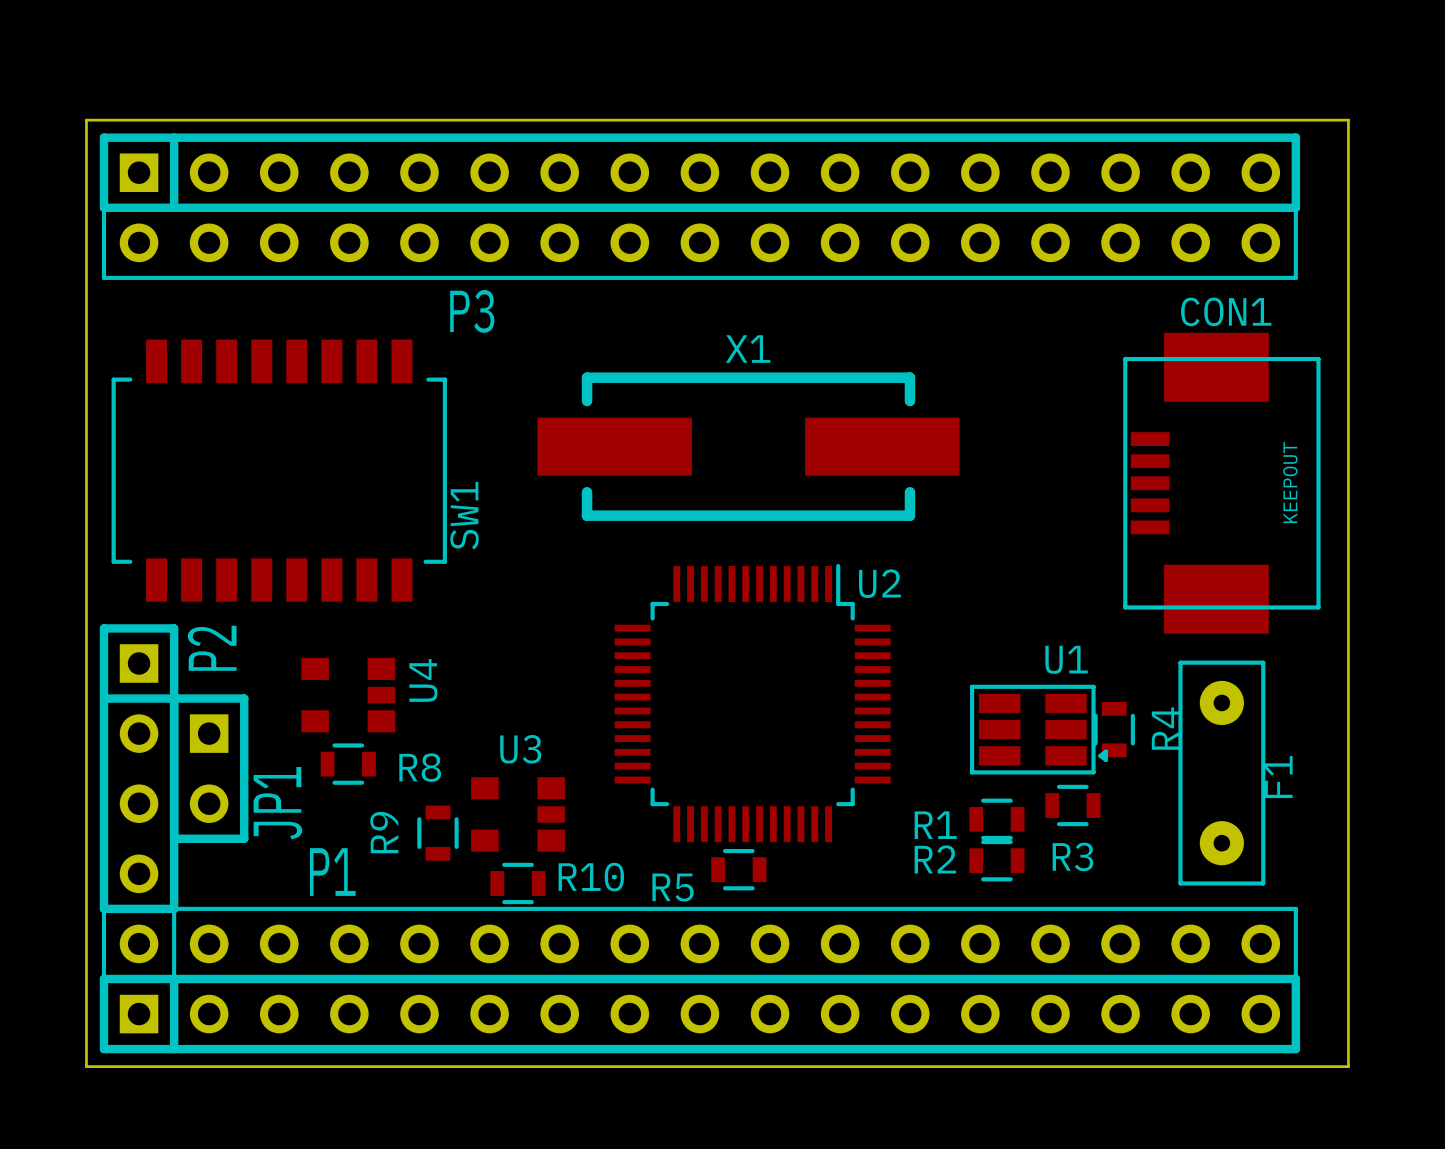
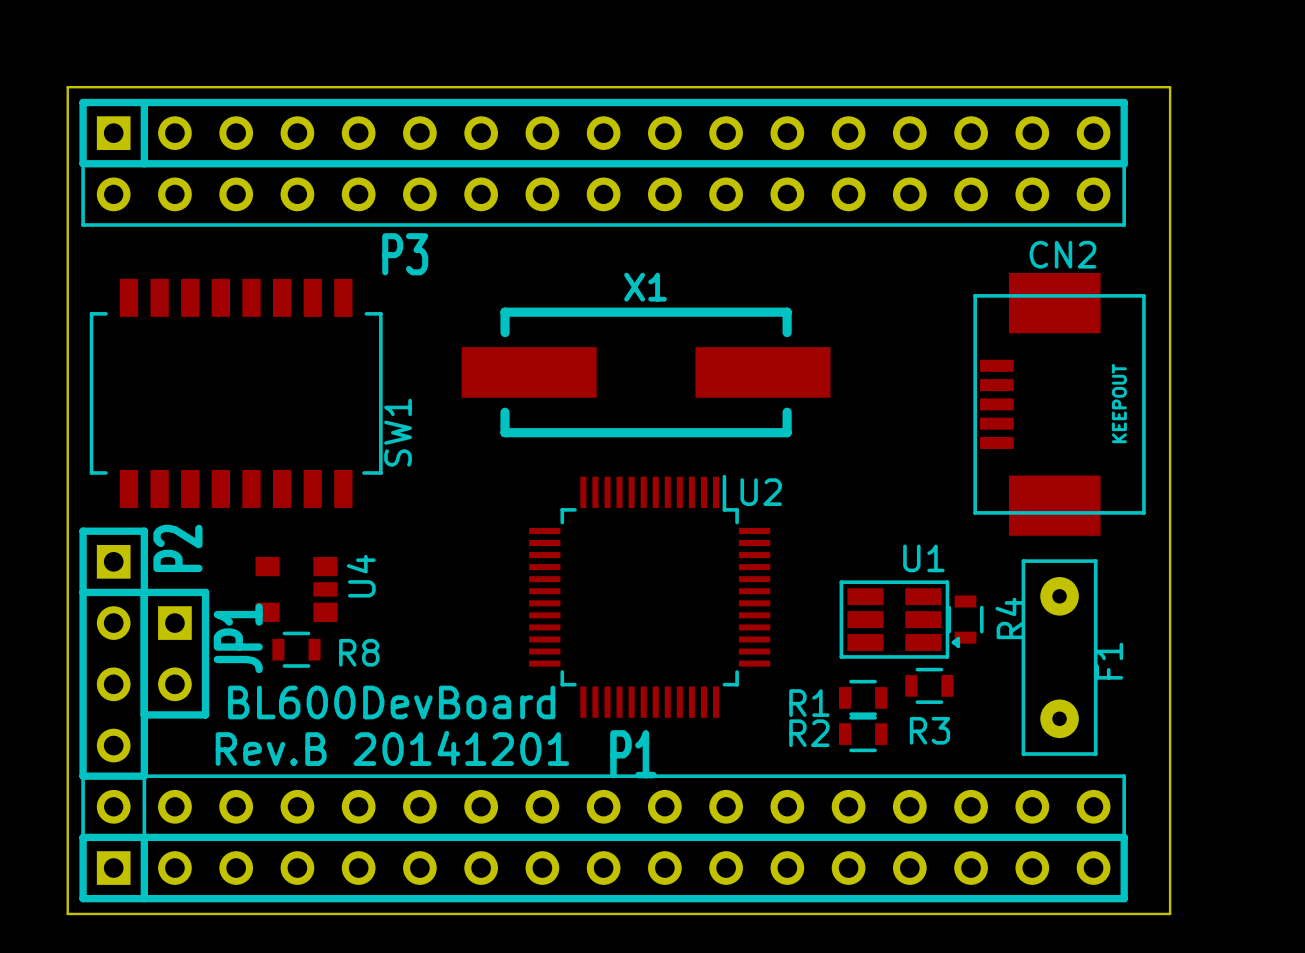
CON1 name: CON1 (1226, 311) -> CN2 (1062, 254)
JP1 name position: JP1 (277, 803) -> JP1 (238, 638)
U3: (518, 814) -> none
text: none -> BL600DevBoard (391, 702)
R9: (437, 833) -> none
R5: (738, 869) -> none
P1 name position: P1 (332, 872) -> P1 (633, 754)
text: none -> Rev.B 20141201 (392, 748)
R10: (518, 883) -> none

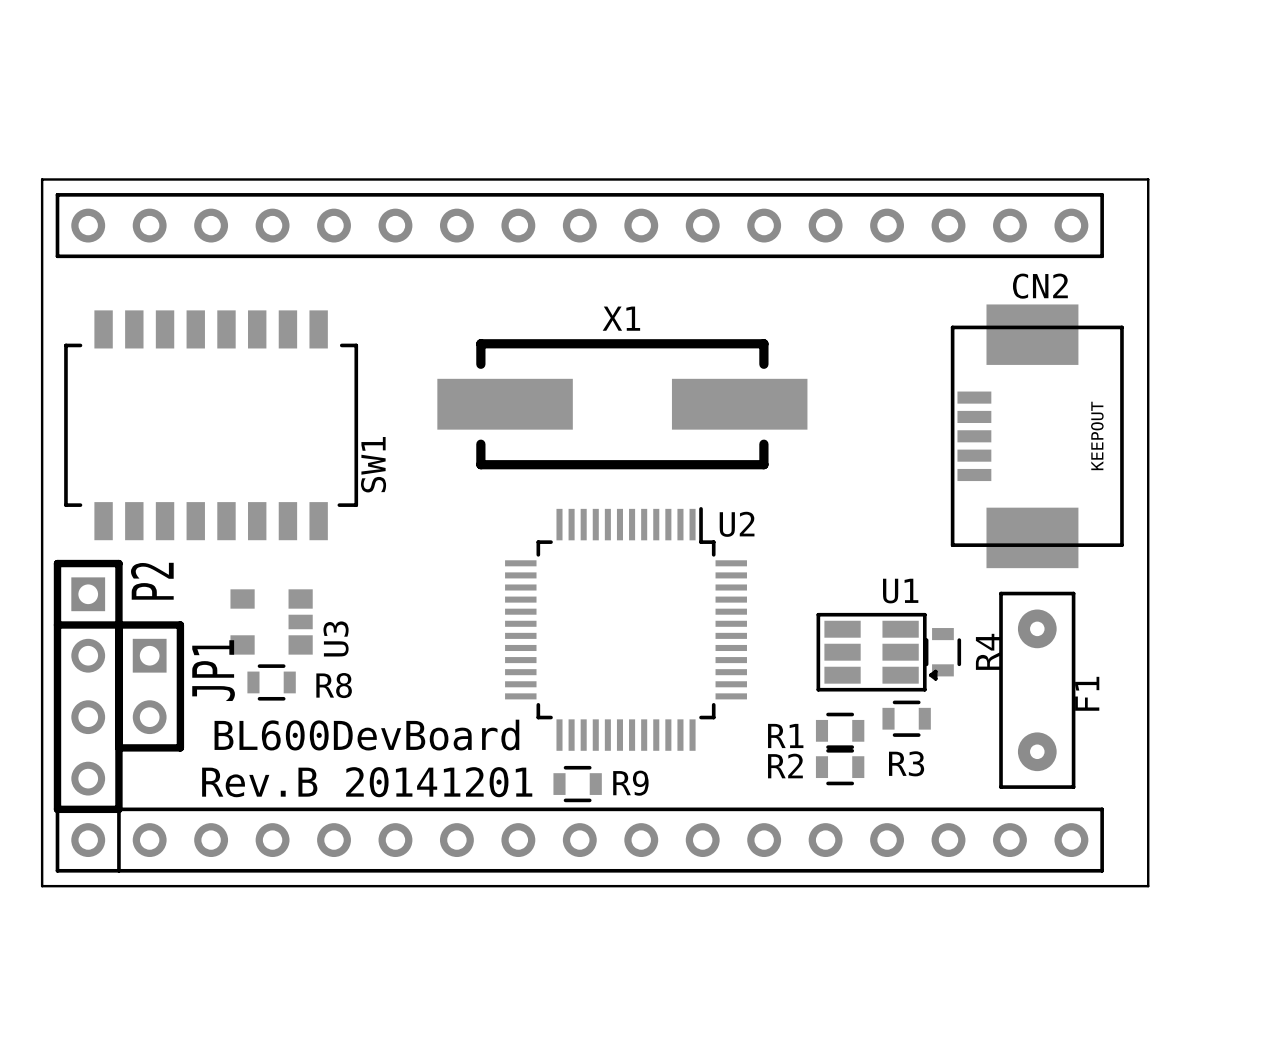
P3: (603, 133) -> none
board edge: (67, 148) (67, 87) (1170, 87) (1170, 148) -> (42, 179) (1148, 179)
U4 name: U4 (361, 576) -> U3 (336, 638)
R9: none -> (577, 784)
board edge: (67, 852) (67, 913) (1170, 913) (1170, 852) -> (42, 886) (1148, 886)
P1: (603, 868) -> none

